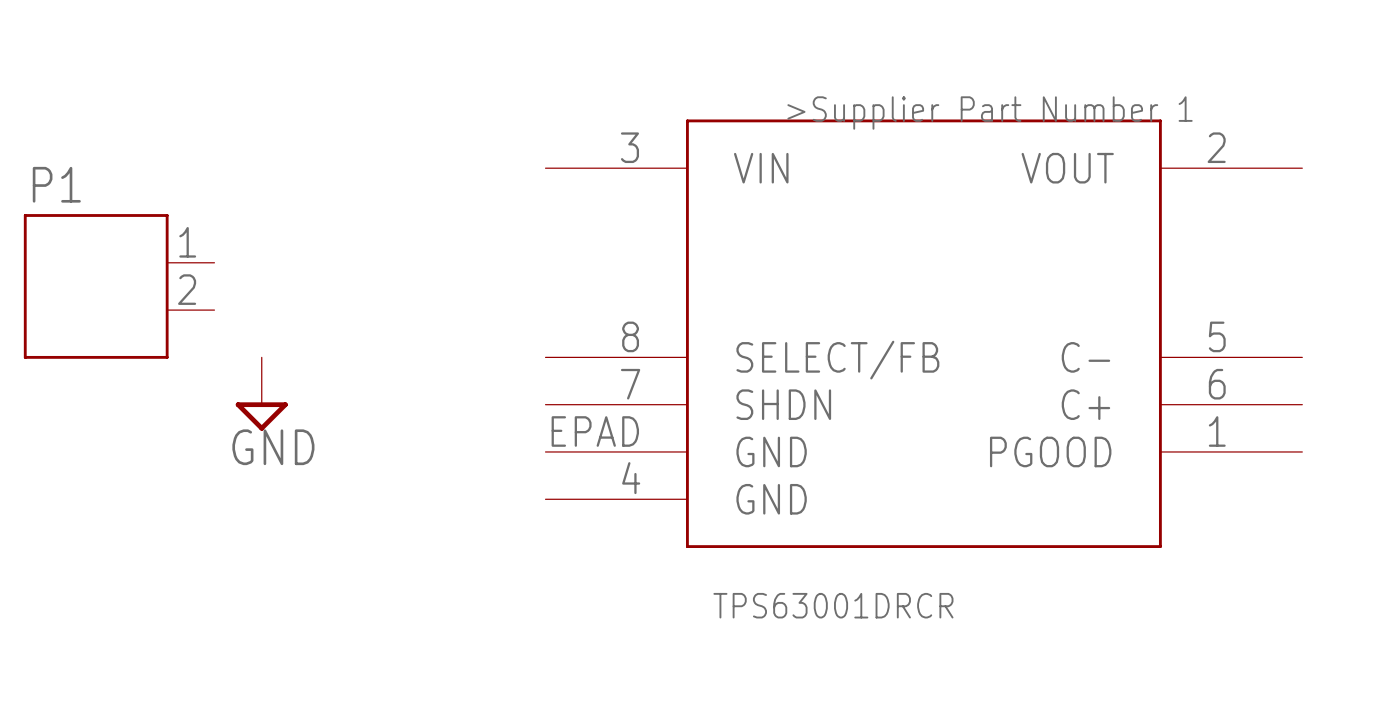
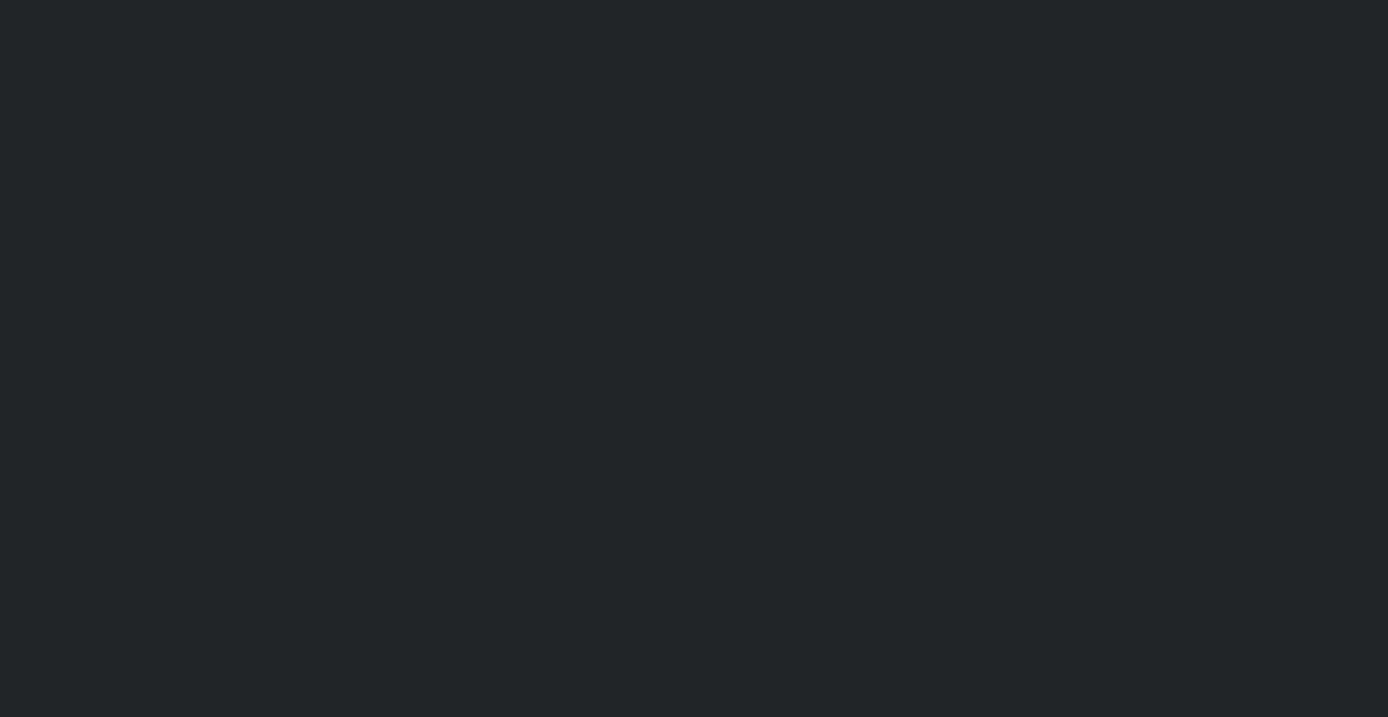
P1: (119, 286) -> none
part: TPS63001DRCR (923, 333) -> none
power symbol: GND (261, 394) -> none

